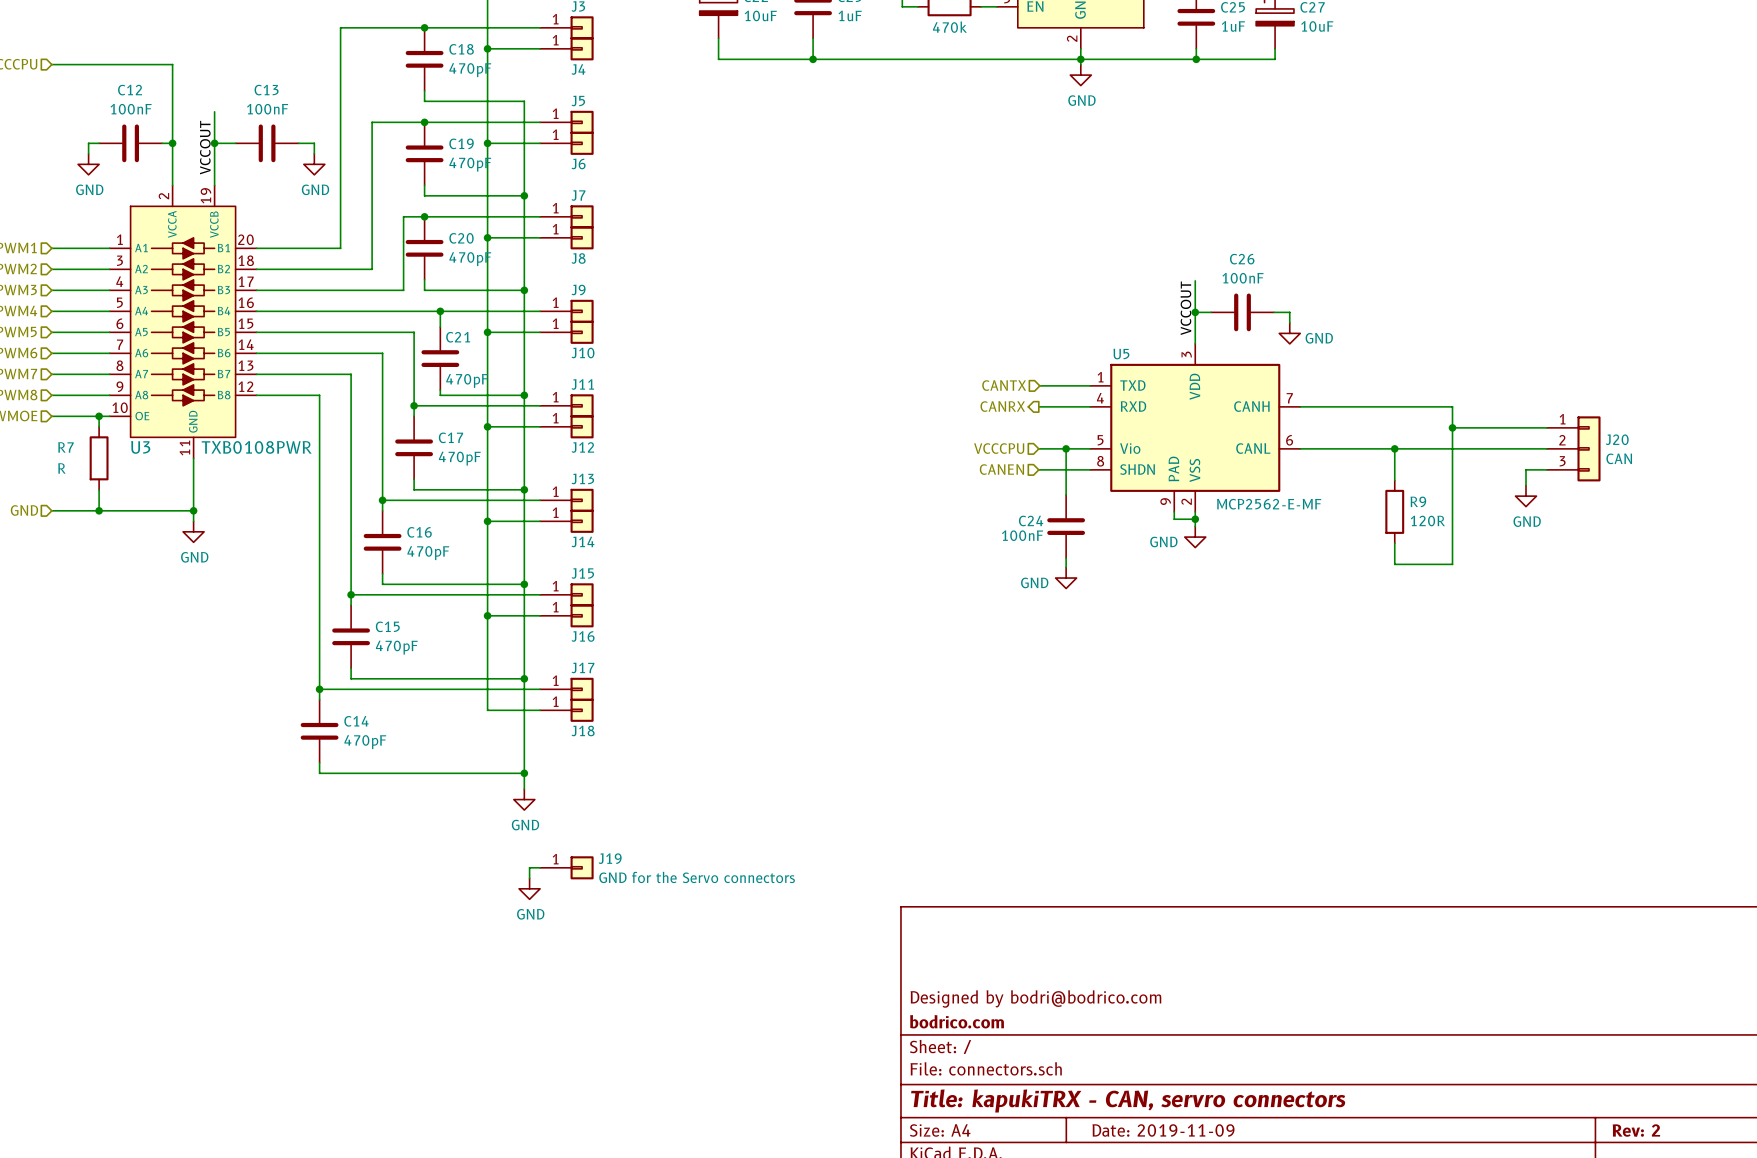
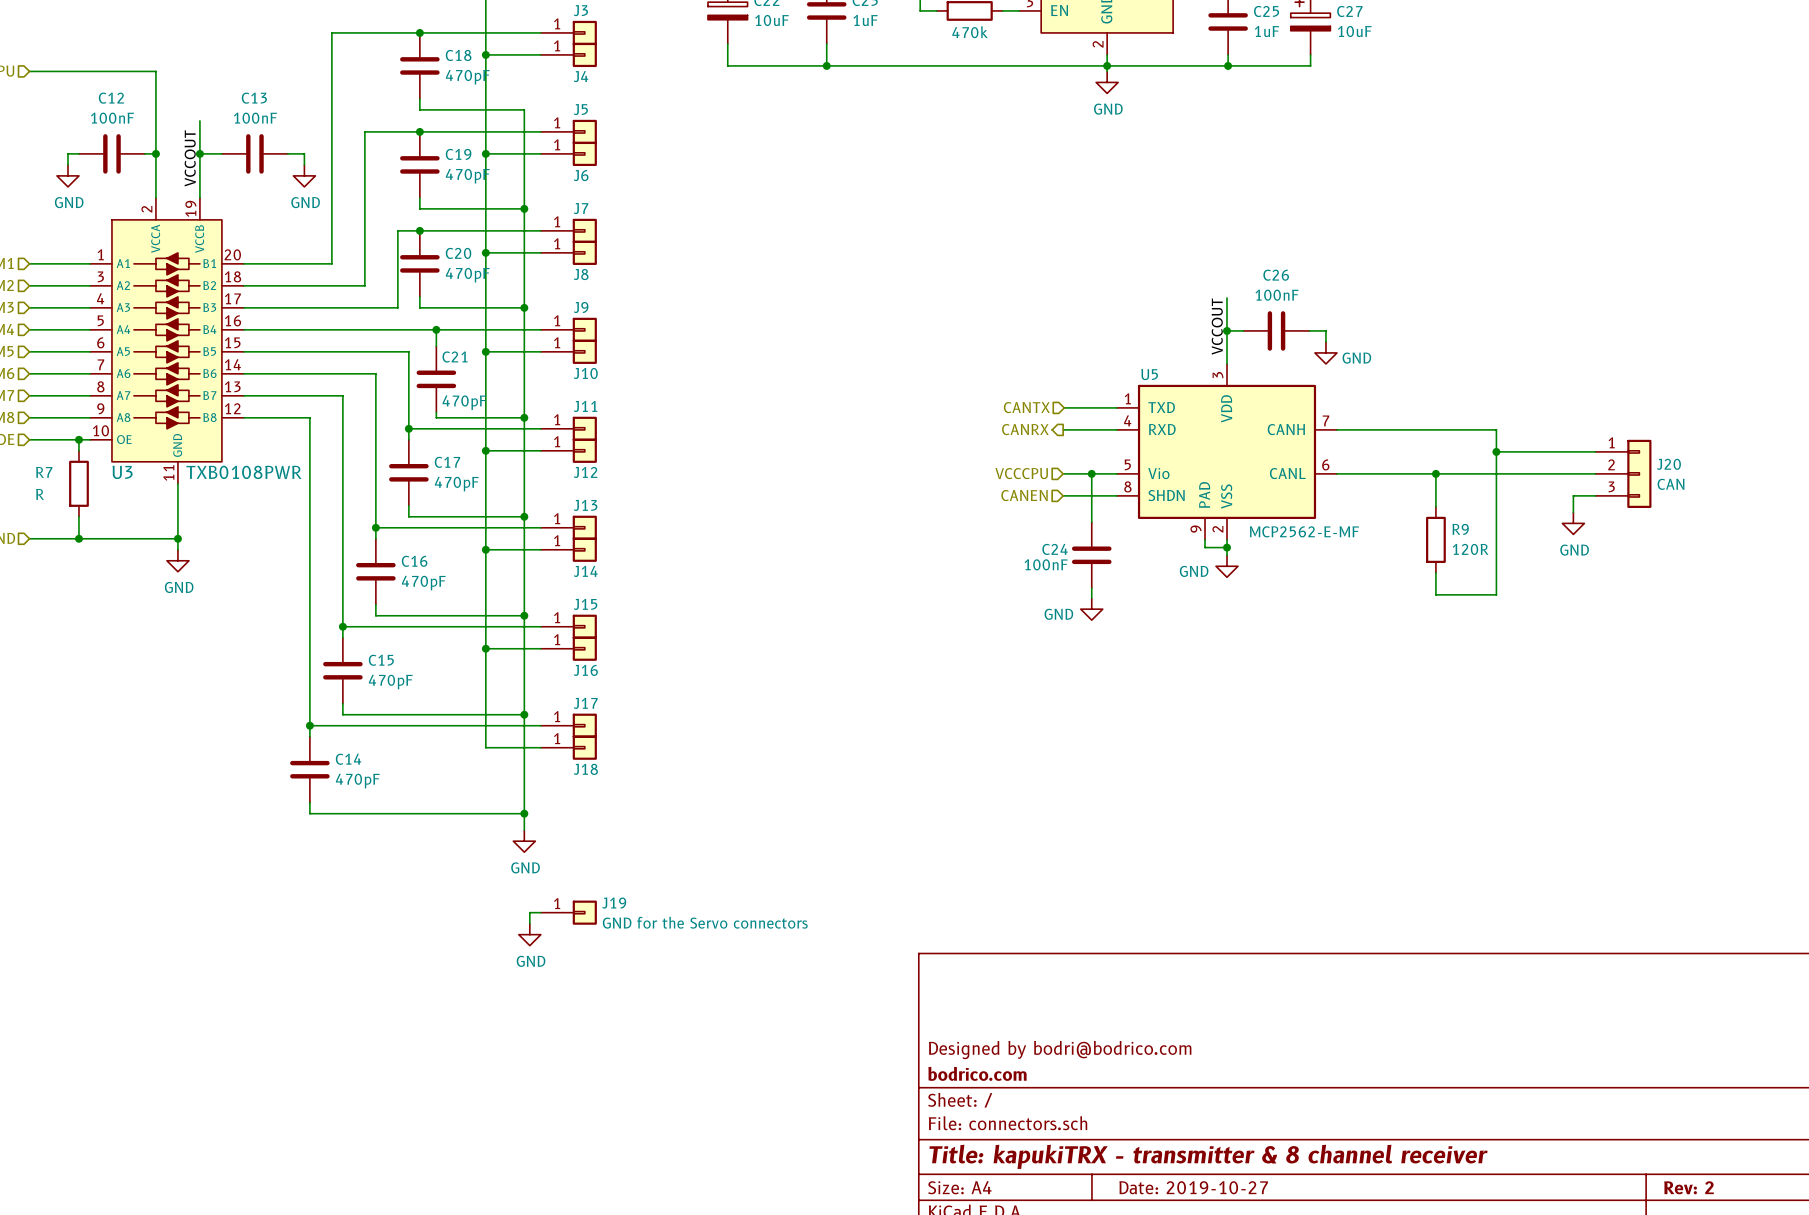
title block: Title: kapukiTRX - CAN, servro connectors (1128, 1100) -> Title: kapukiTRX - transmitter & 8 channel receiver (1208, 1156)
title block: Date: 2019-11-09 (1163, 1130) -> Date: 2019-10-27 (1193, 1187)

